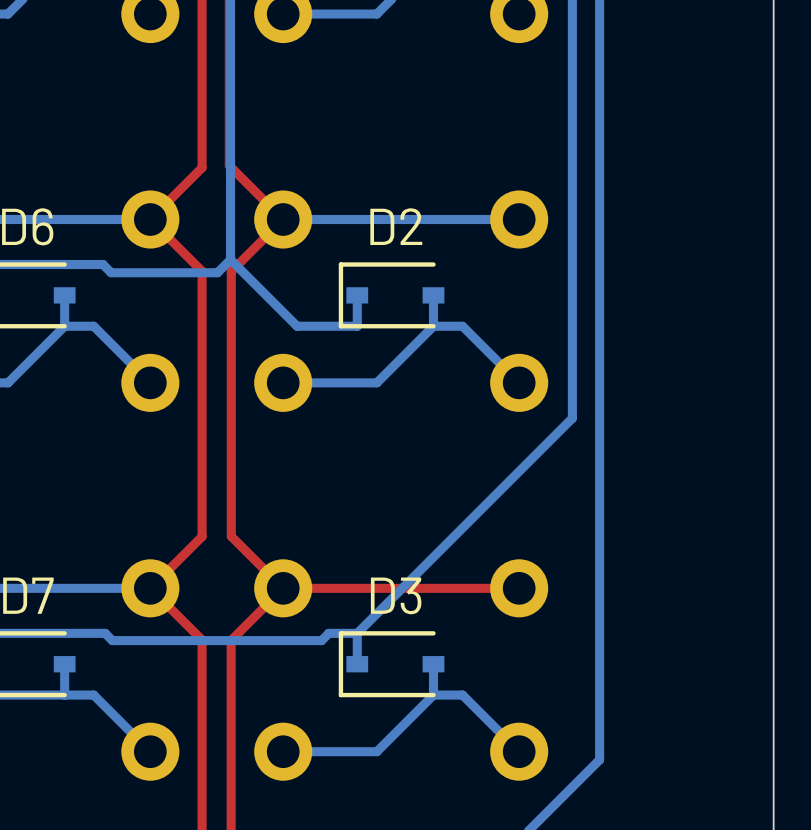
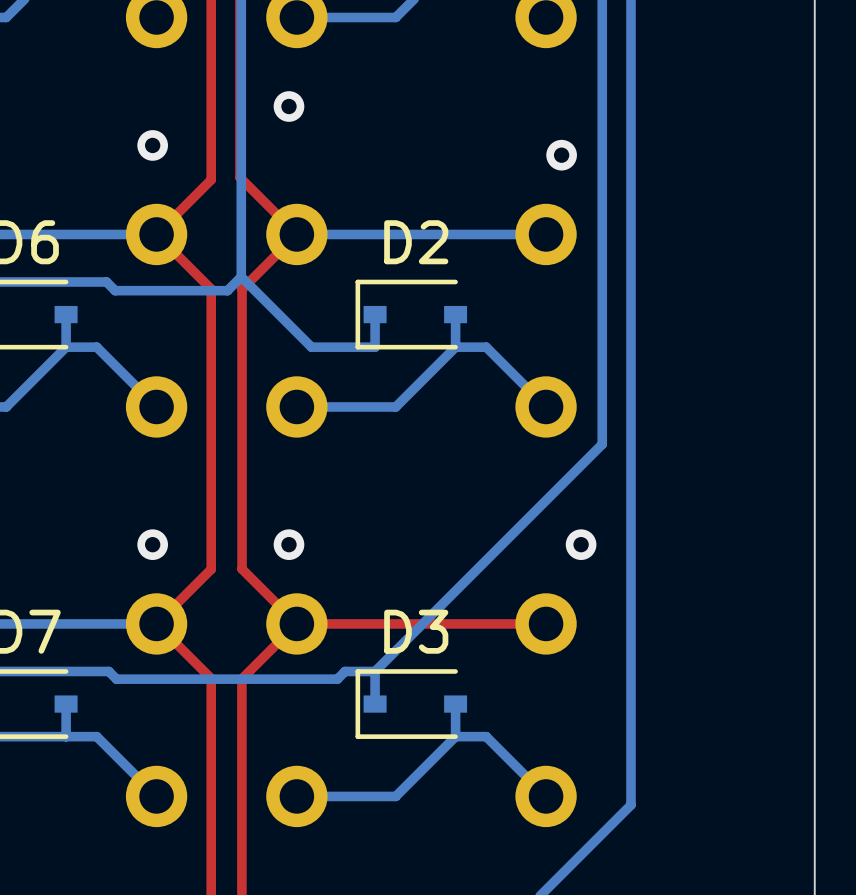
via: none -> (288, 106)
via: none -> (152, 145)
via: none -> (561, 155)
via: none -> (152, 544)
via: none -> (288, 544)
via: none -> (581, 544)

